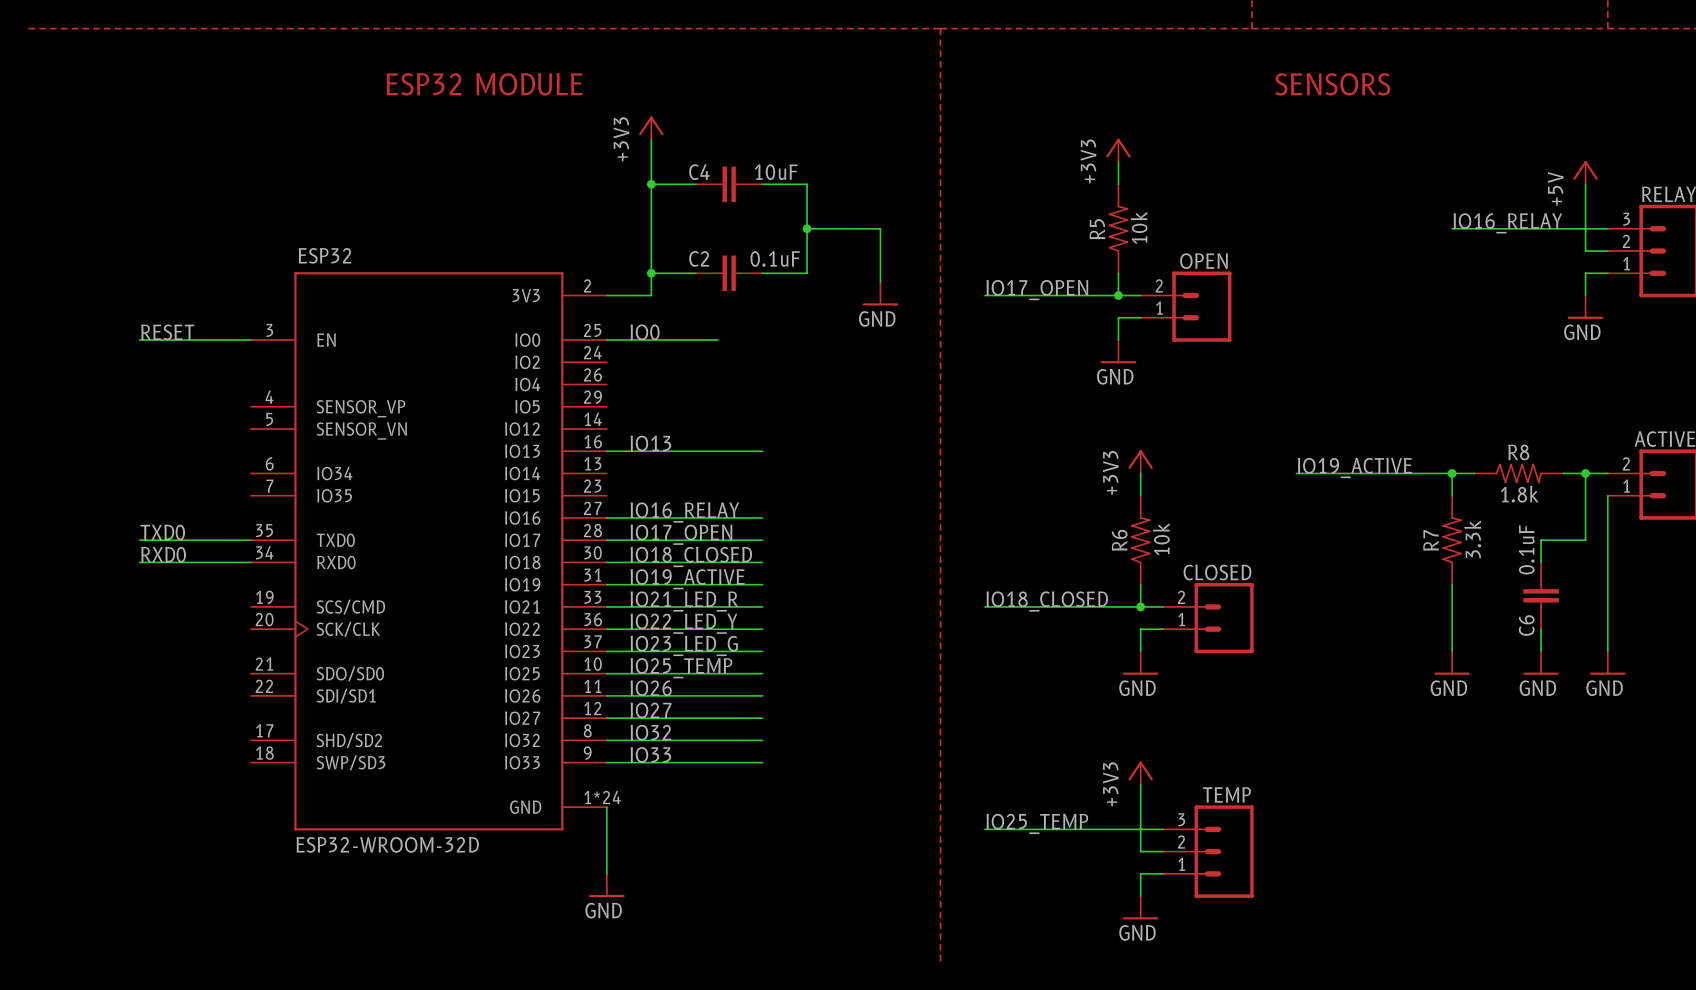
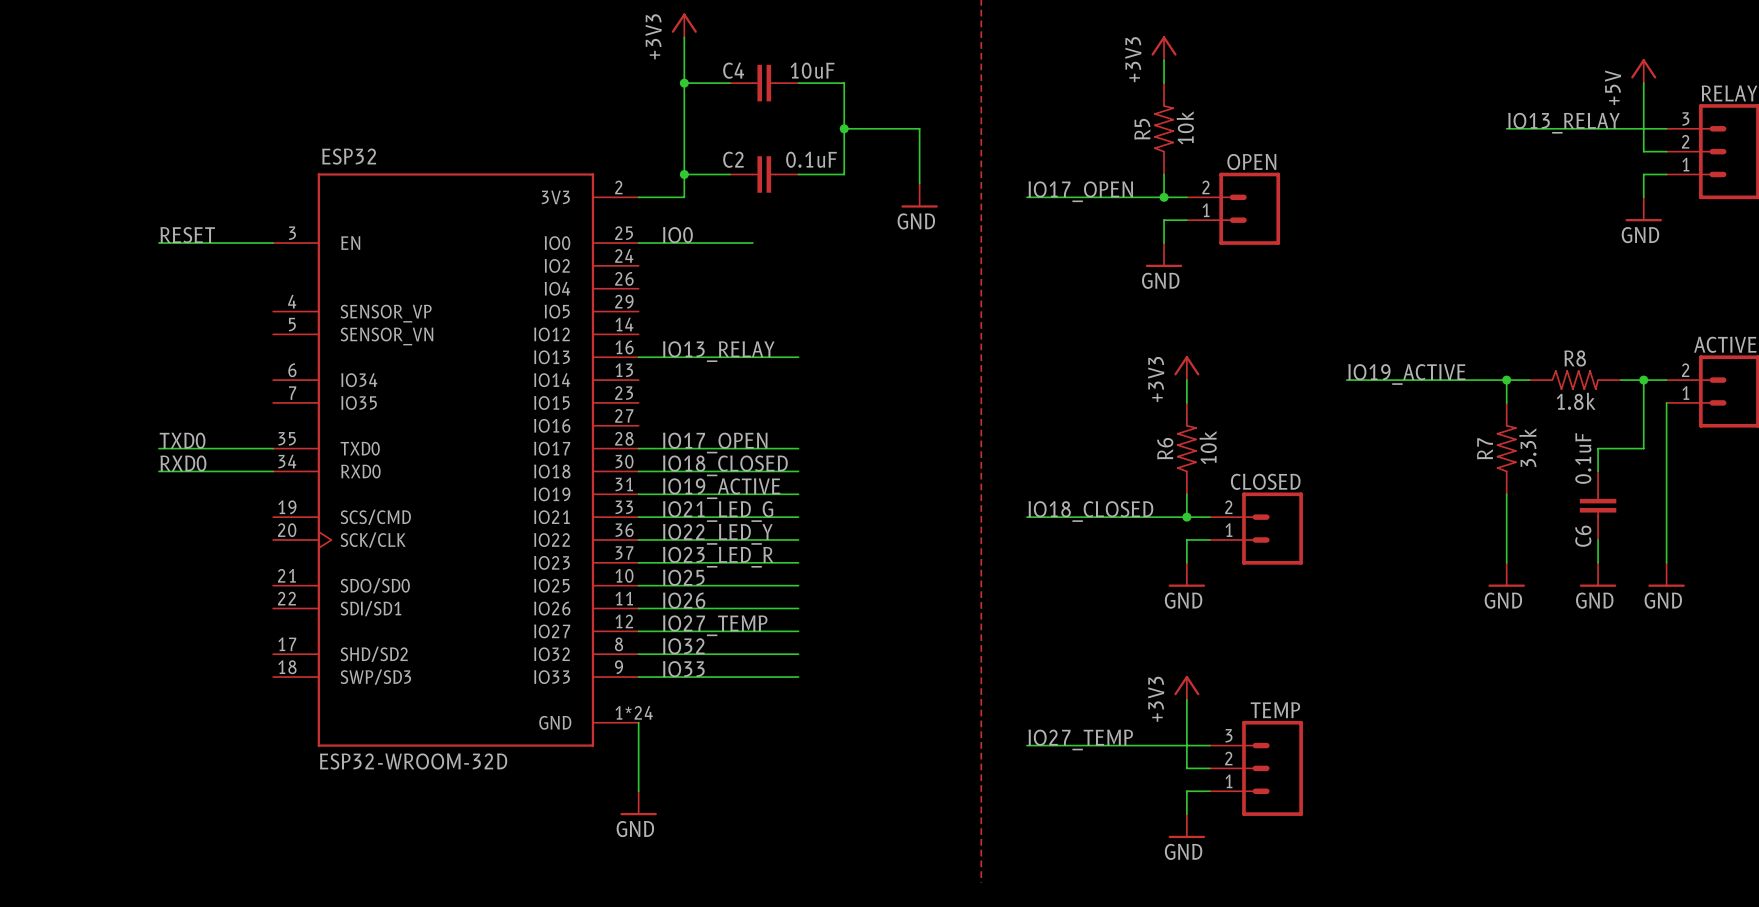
label: IO16_RELAY (1507, 223) -> IO13_RELAY (1563, 123)
label: IO13 (650, 443) -> IO13_RELAY (718, 351)
label: IO16_RELAY (684, 512) -> none
wire: (606, 517) (762, 517) -> none
label: IO21_LED_R (684, 601) -> IO21_LED_G (718, 511)
label: IO23_LED_G (684, 645) -> IO23_LED_R (718, 557)
label: IO25_TEMP (681, 668) -> IO25 (683, 577)
label: IO27 (651, 710) -> IO27_TEMP (715, 625)
label: IO25_TEMP (1037, 823) -> IO27_TEMP (1080, 739)

